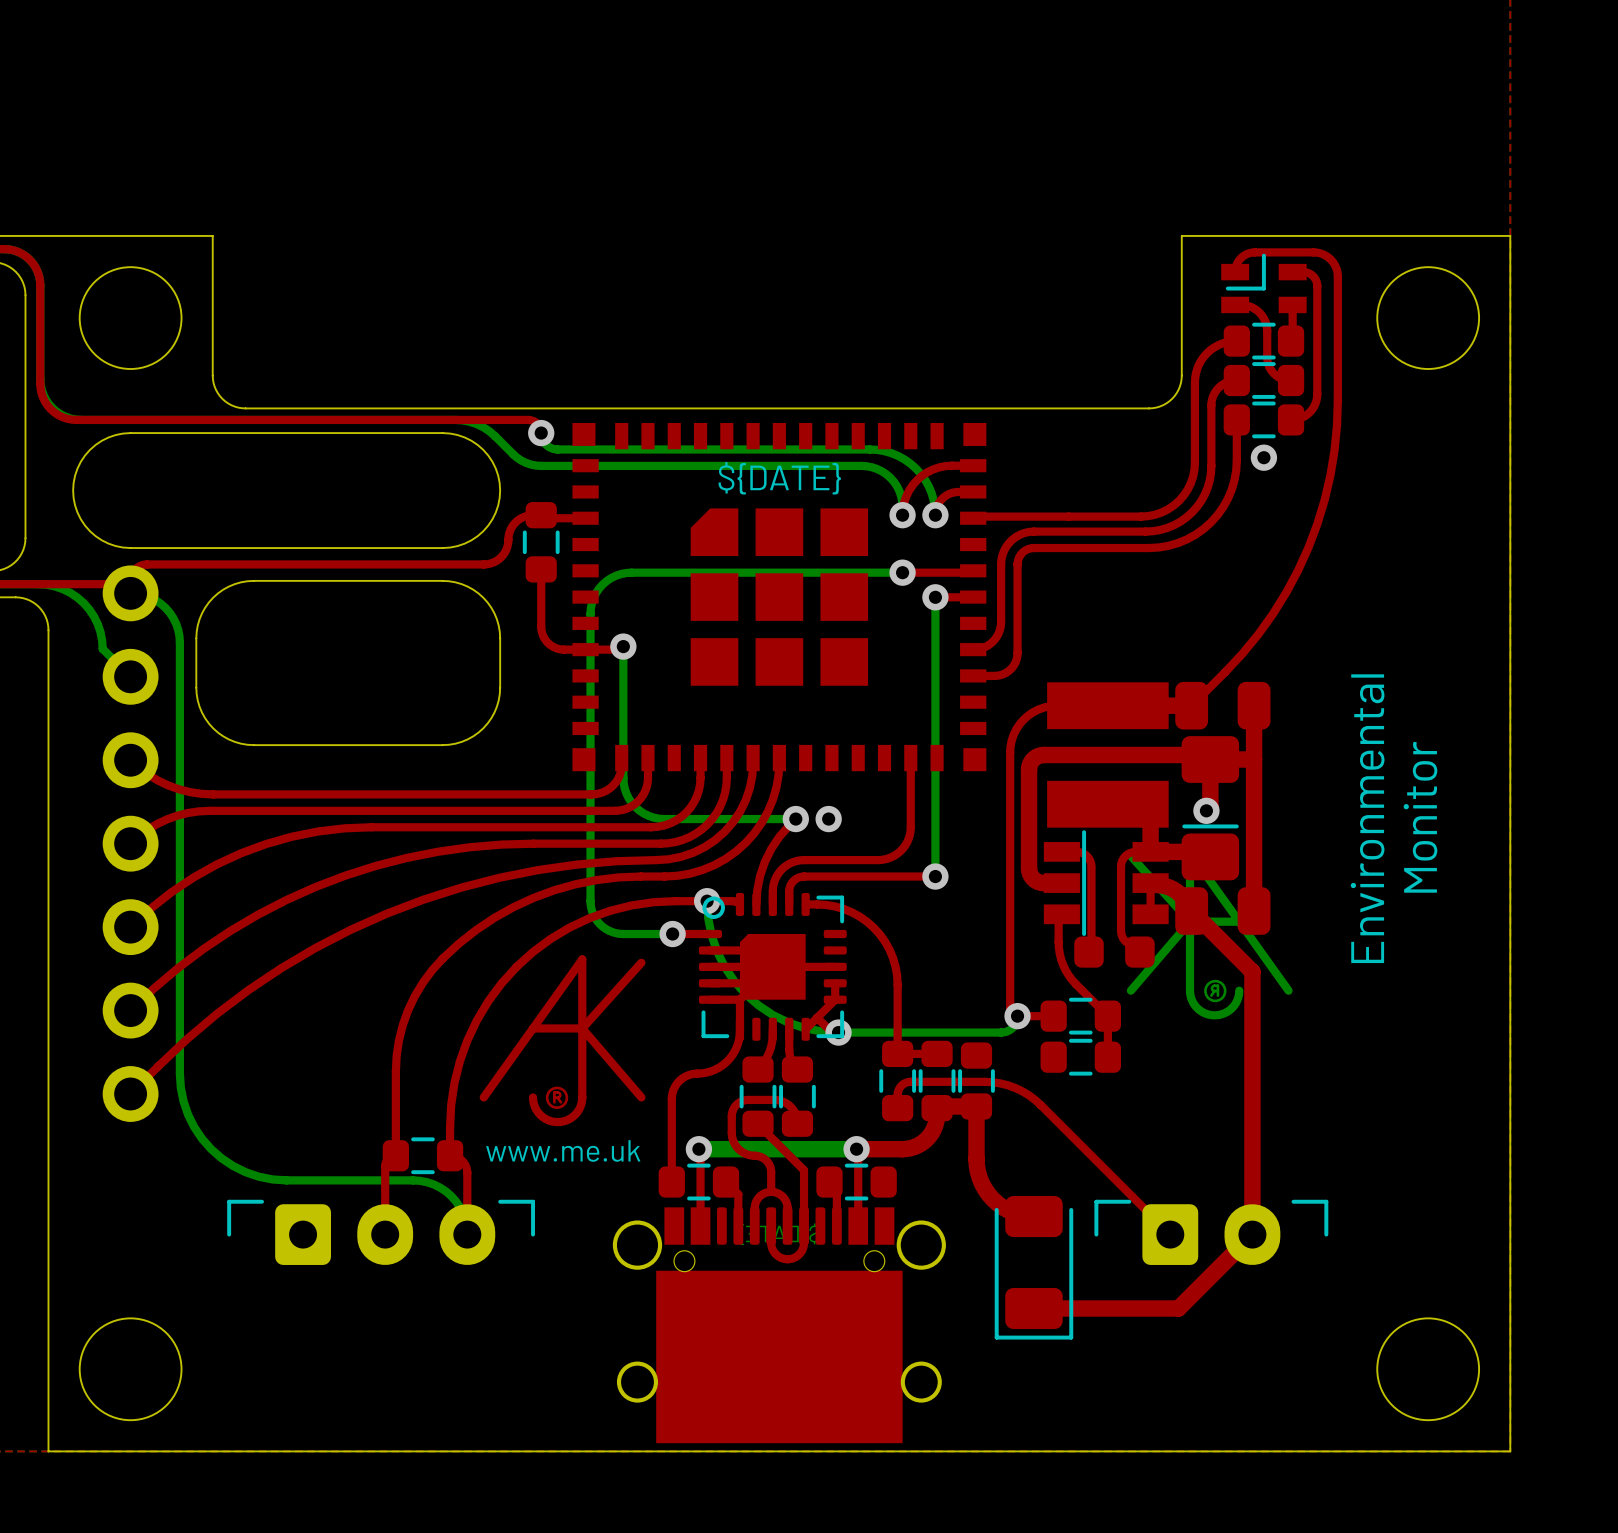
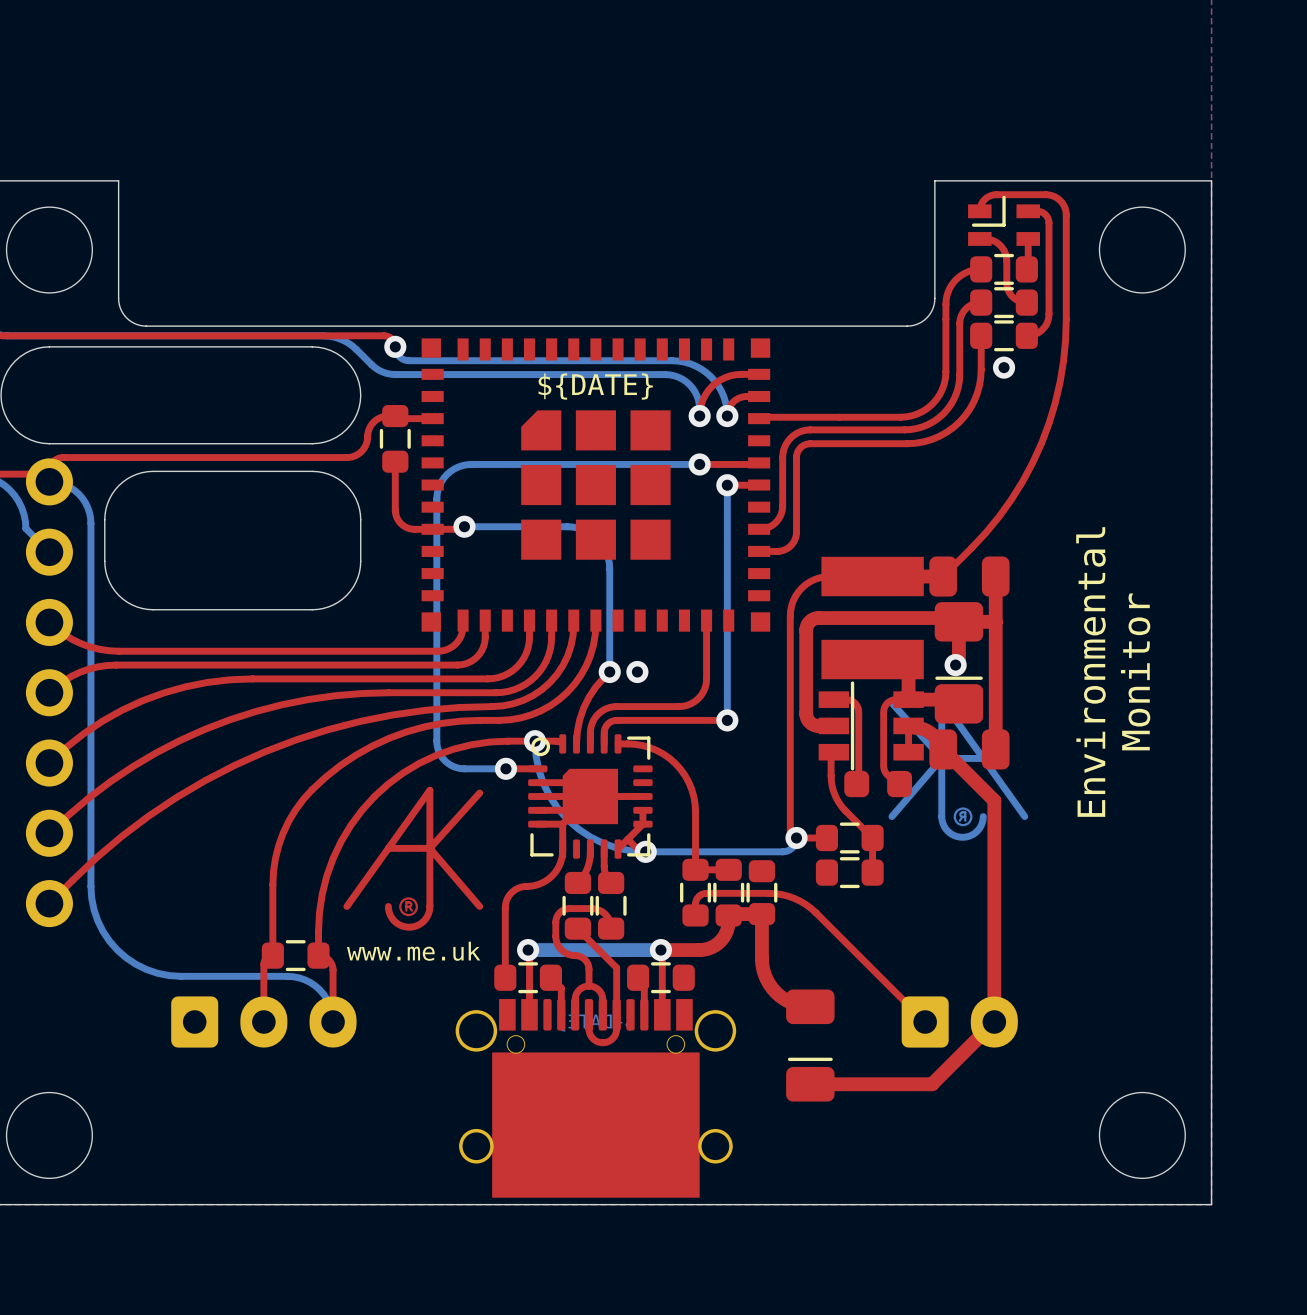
bottom track: (623, 646) (623, 783) (626, 793) (635, 807) (643, 813) (659, 818) (795, 819) -> (464, 526) (572, 527) (588, 532) (597, 539) (606, 552) (609, 563) (609, 671)
part footprint: [994, 1195, 1074, 1340] -> [786, 989, 835, 1102]
part footprint: [227, 1199, 535, 1265] -> [171, 996, 357, 1048]
part footprint: [1094, 1199, 1329, 1265] -> [901, 996, 1018, 1048]

